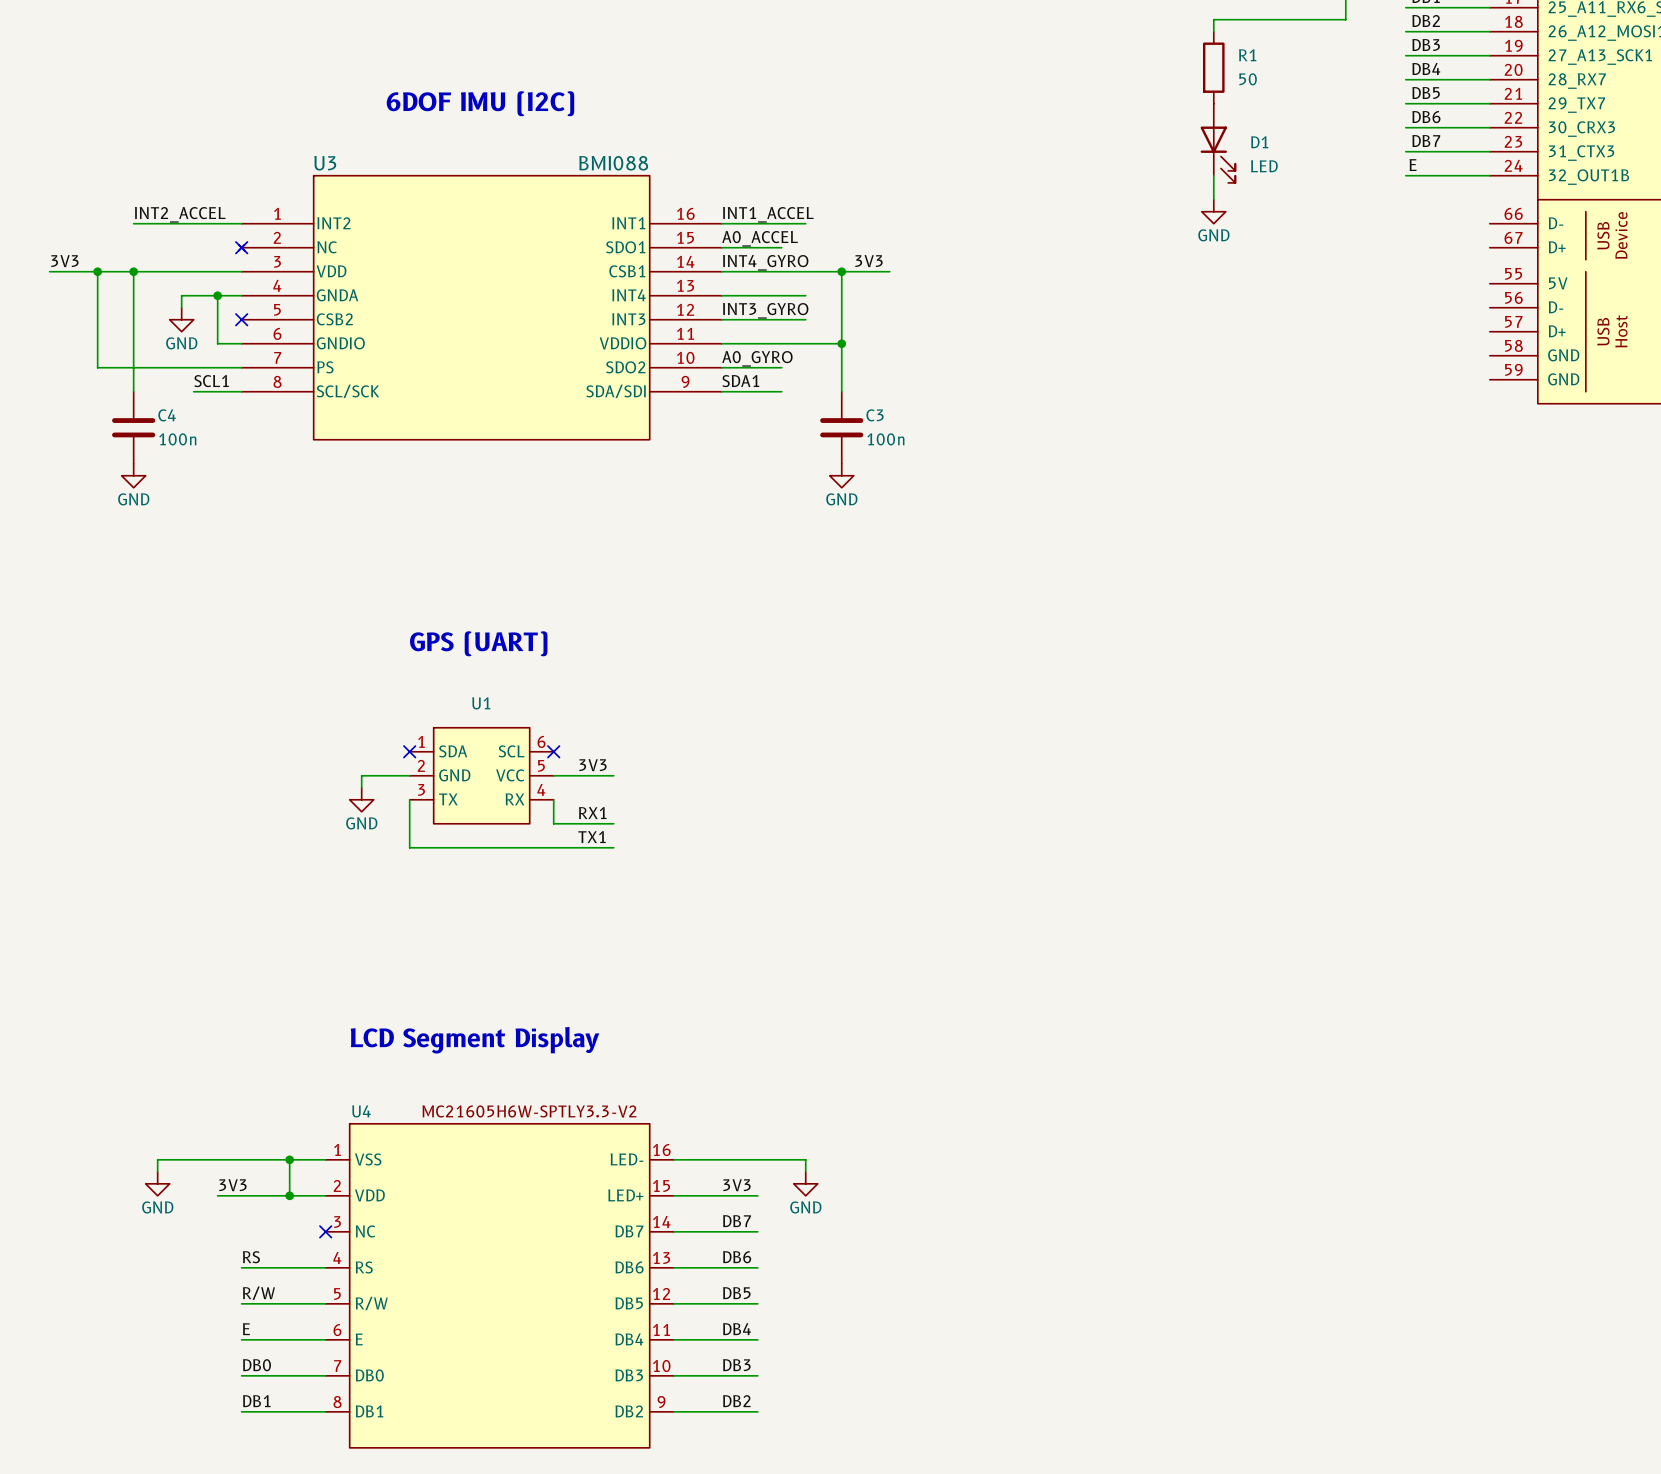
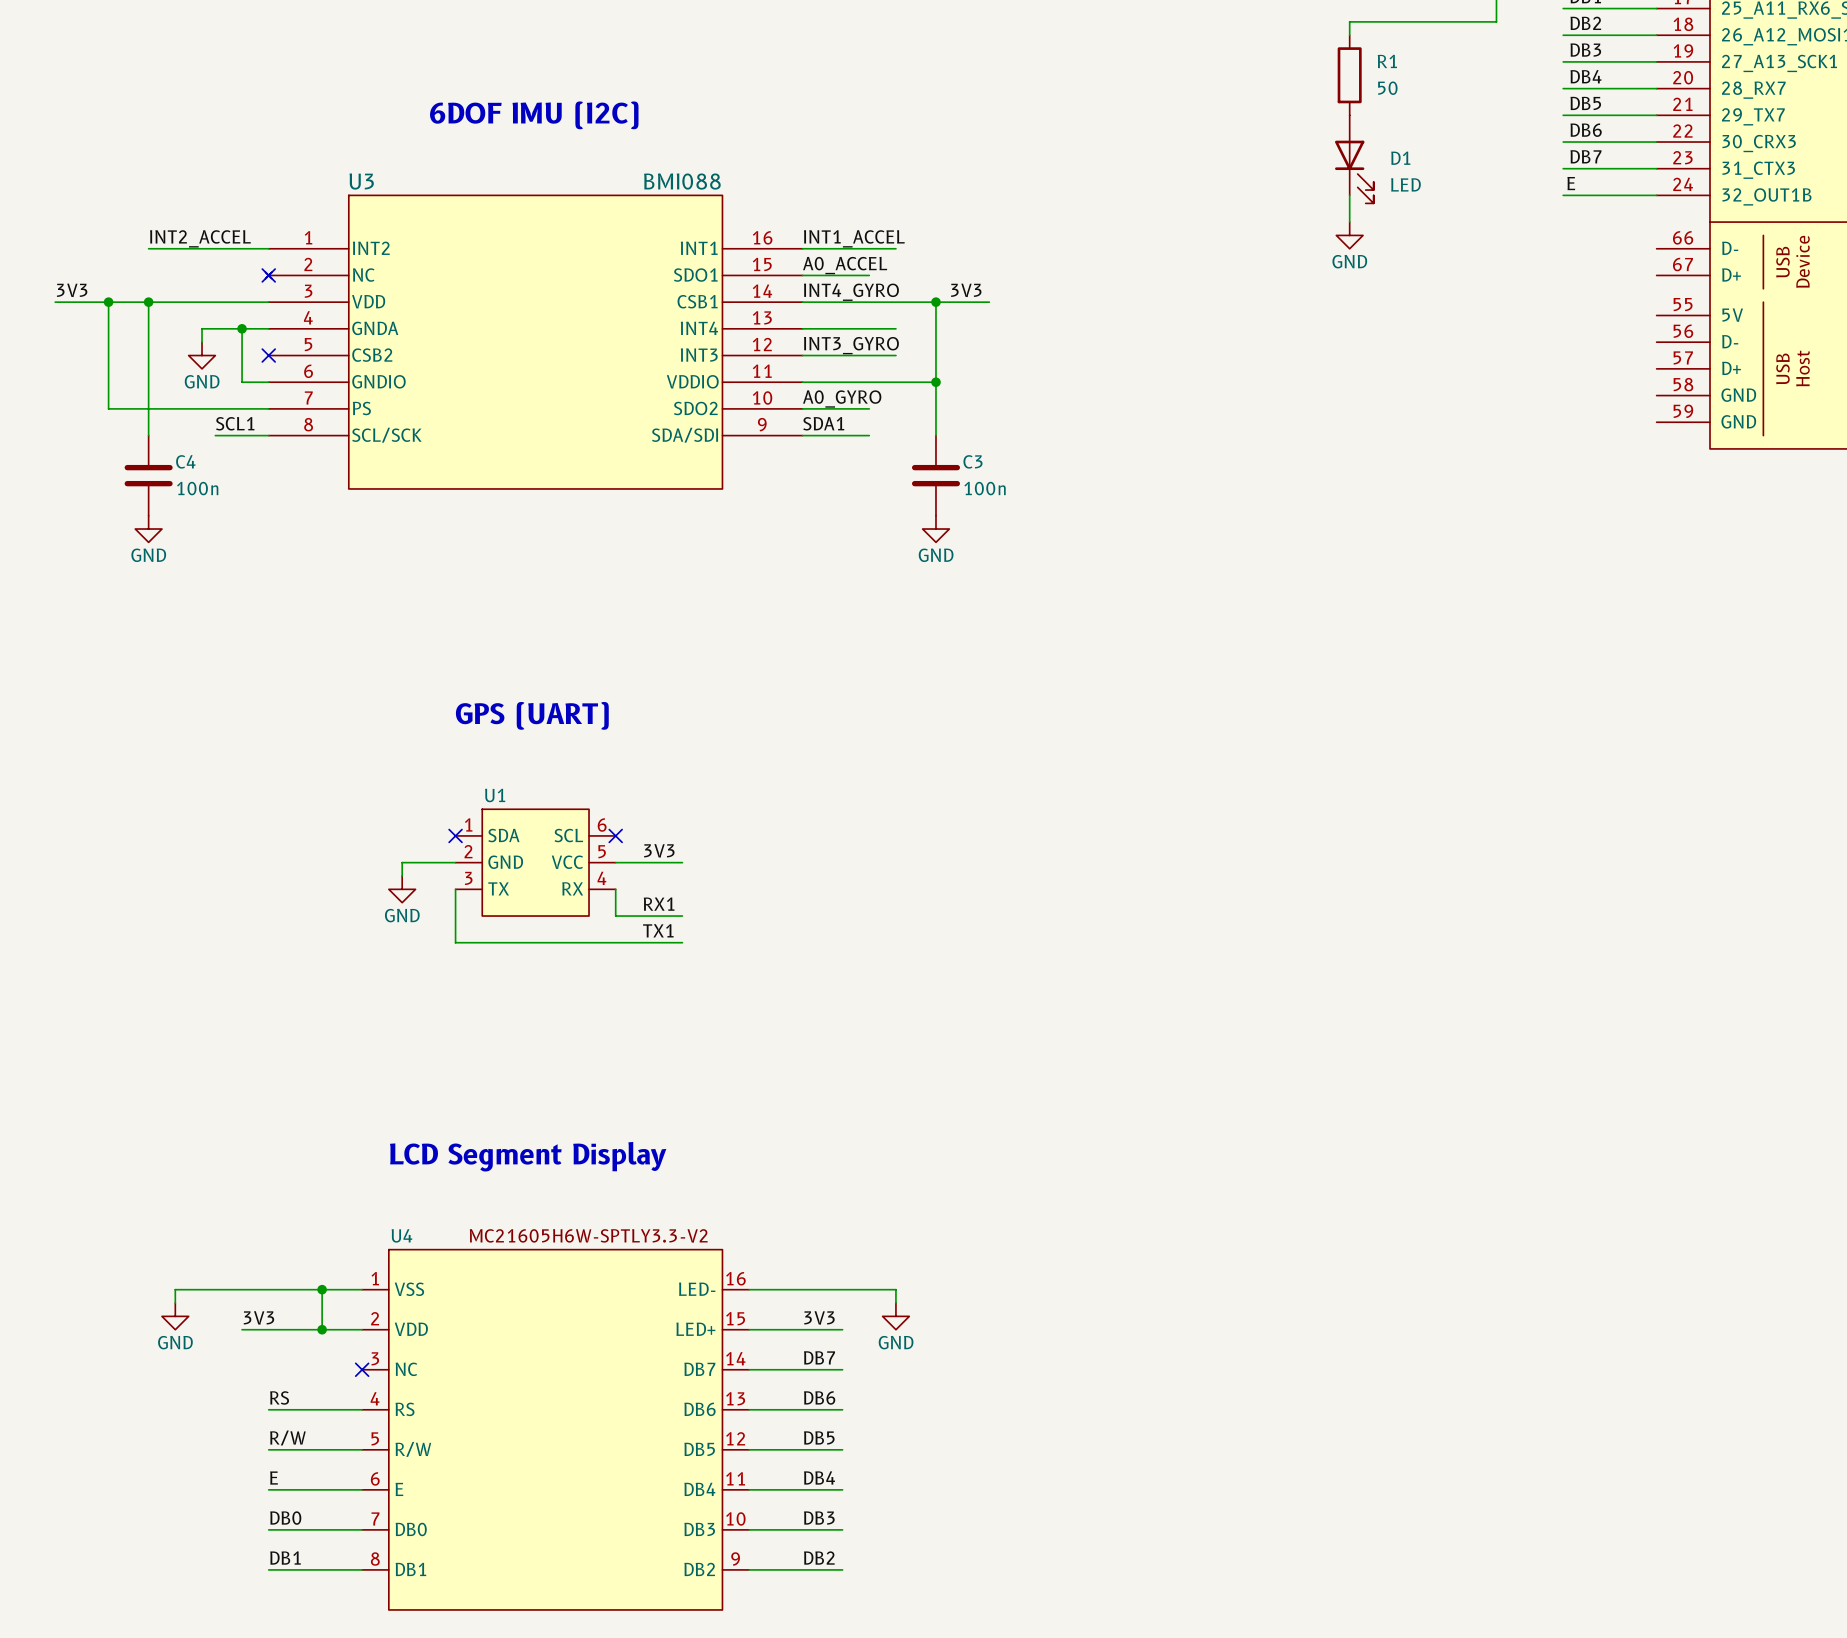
U1 name position: U1 (481, 703) -> U1 (495, 795)

